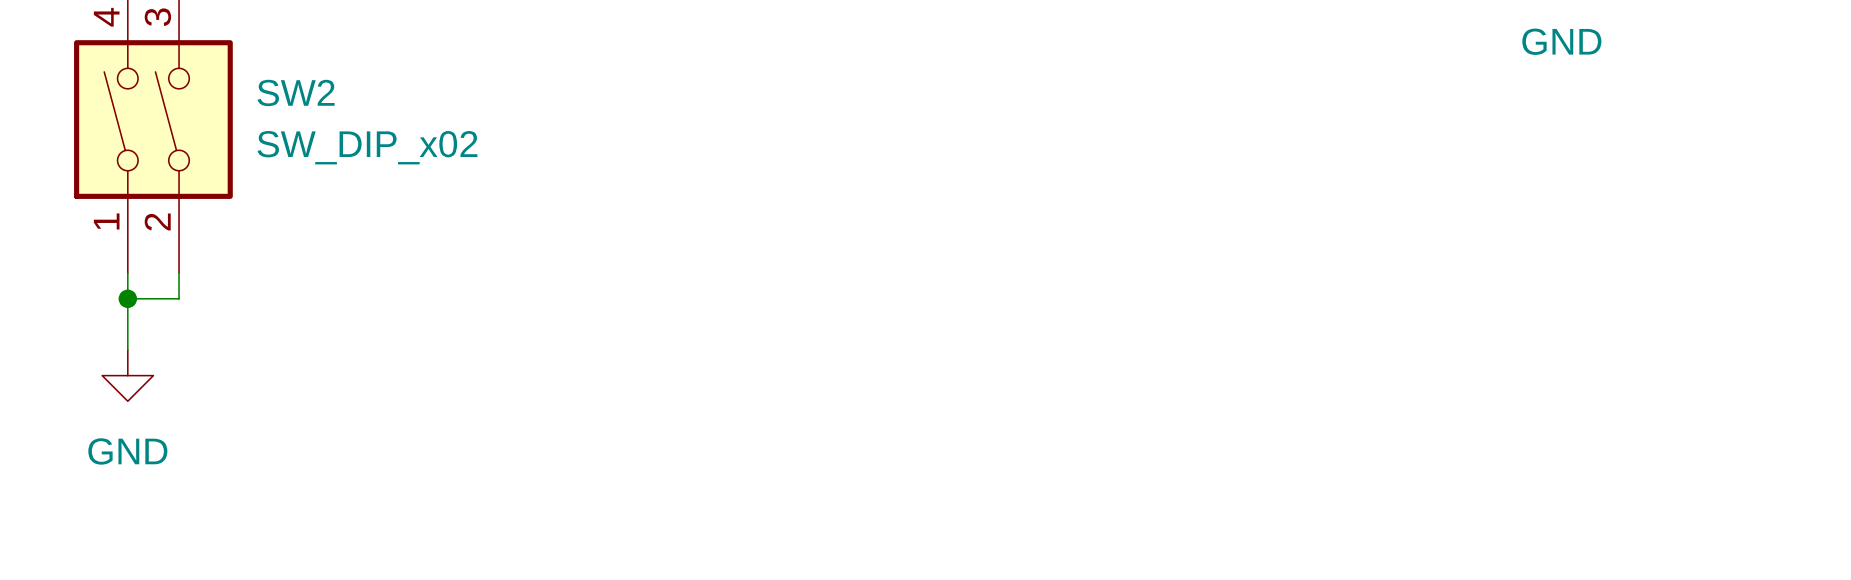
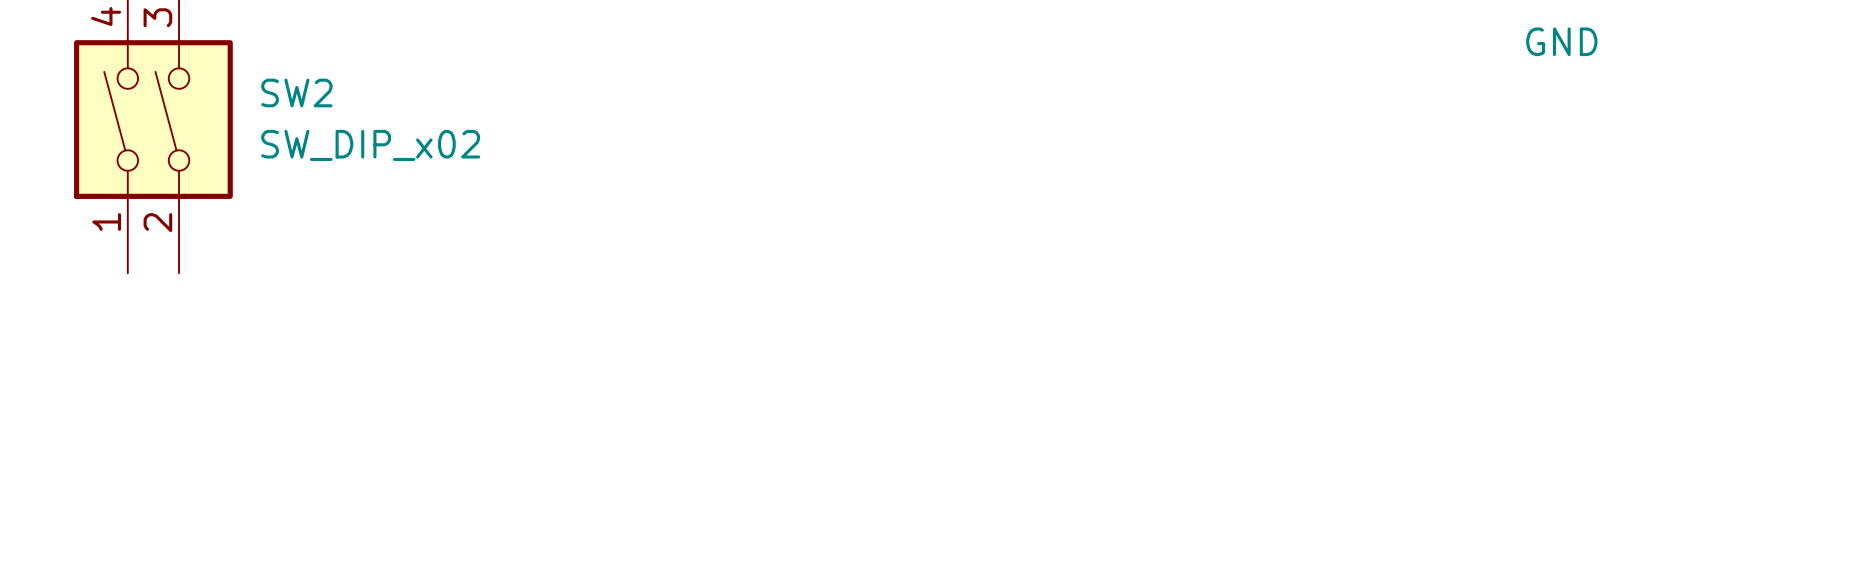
wire: (127, 273) (127, 350) -> none
wire: (179, 273) (179, 298) (127, 298) -> none
junction: (127, 298) -> none
power symbol: GND (127, 375) -> none

